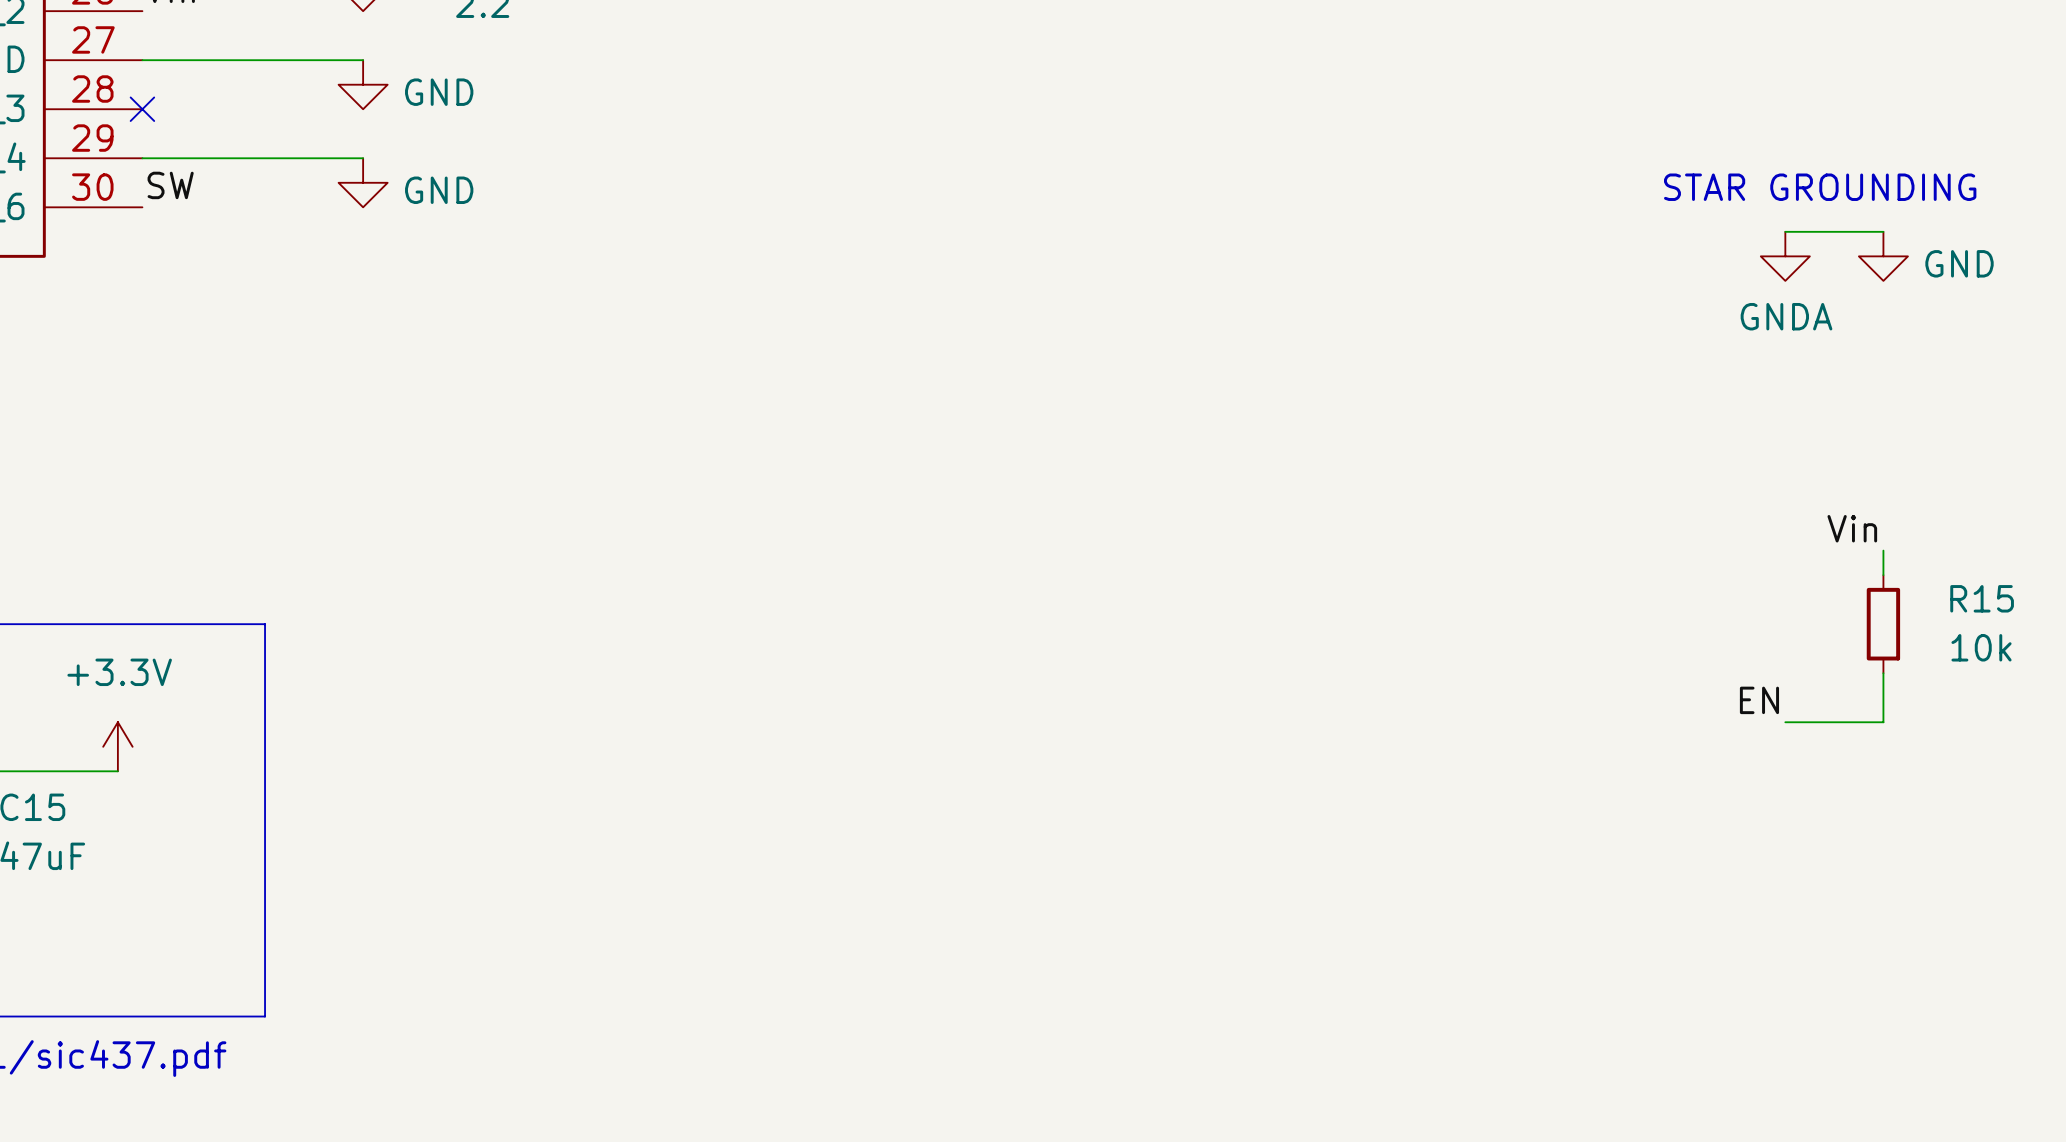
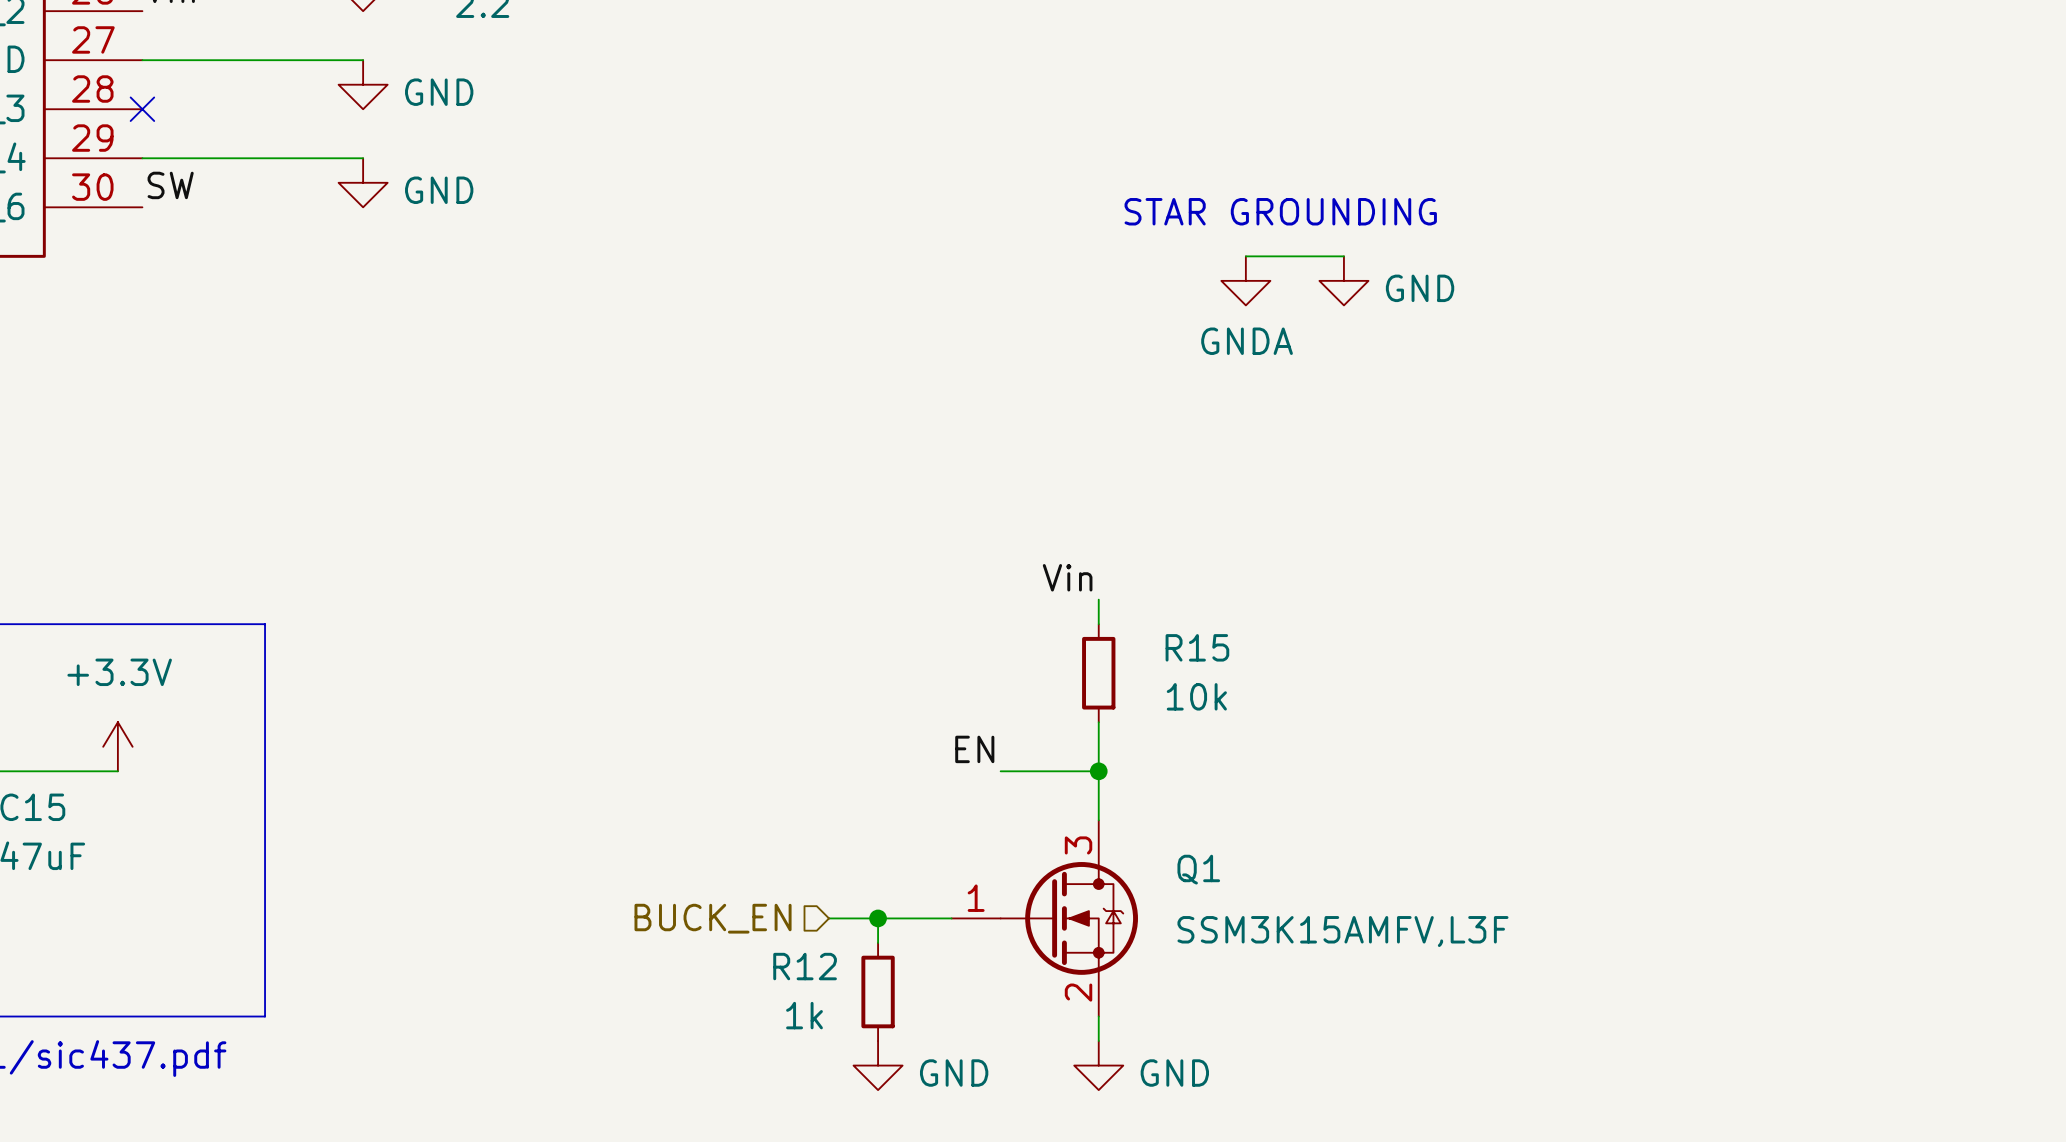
text: STAR GROUNDING (1820, 187) -> none
text: none -> STAR GROUNDING (1280, 211)
wire: (1785, 231) (1883, 231) -> none
wire: none -> (1245, 256) (1343, 256)
power symbol: GNDA (1785, 256) -> none
power symbol: GND (1883, 256) -> none
power symbol: none -> GNDA (1245, 280)
power symbol: none -> GND (1343, 280)
label: Vin (1852, 528) -> none
wire: (1883, 550) (1883, 575) -> none
label: none -> Vin (1067, 577)
wire: none -> (1098, 599) (1098, 624)
R15 position: (1883, 624) -> (1098, 673)
wire: (1883, 673) (1883, 722) (1785, 722) -> none
label: EN (1759, 700) -> none
wire: none -> (1098, 722) (1098, 820)
label: none -> EN (974, 749)
wire: none -> (1000, 771) (1098, 771)
junction: none -> (1098, 771)
hierarchical label: none -> BUCK_EN (713, 918)
wire: none -> (829, 918) (951, 918)
wire: none -> (878, 918) (878, 942)
junction: none -> (878, 918)
Q1: none -> SSM3K15AMFV,L3F (1044, 918)
R12: none -> 1k (878, 991)
wire: none -> (1098, 1016) (1098, 1041)
power symbol: none -> GND (878, 1065)
power symbol: none -> GND (1098, 1065)

